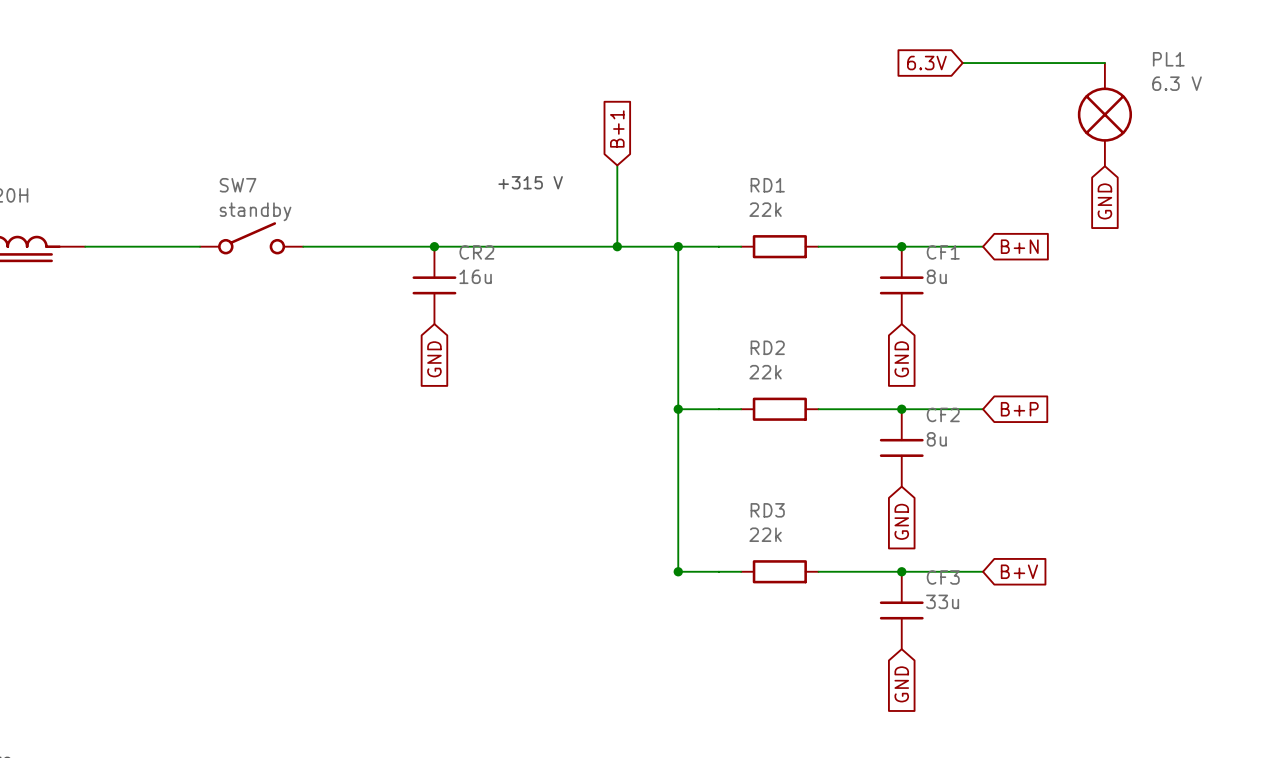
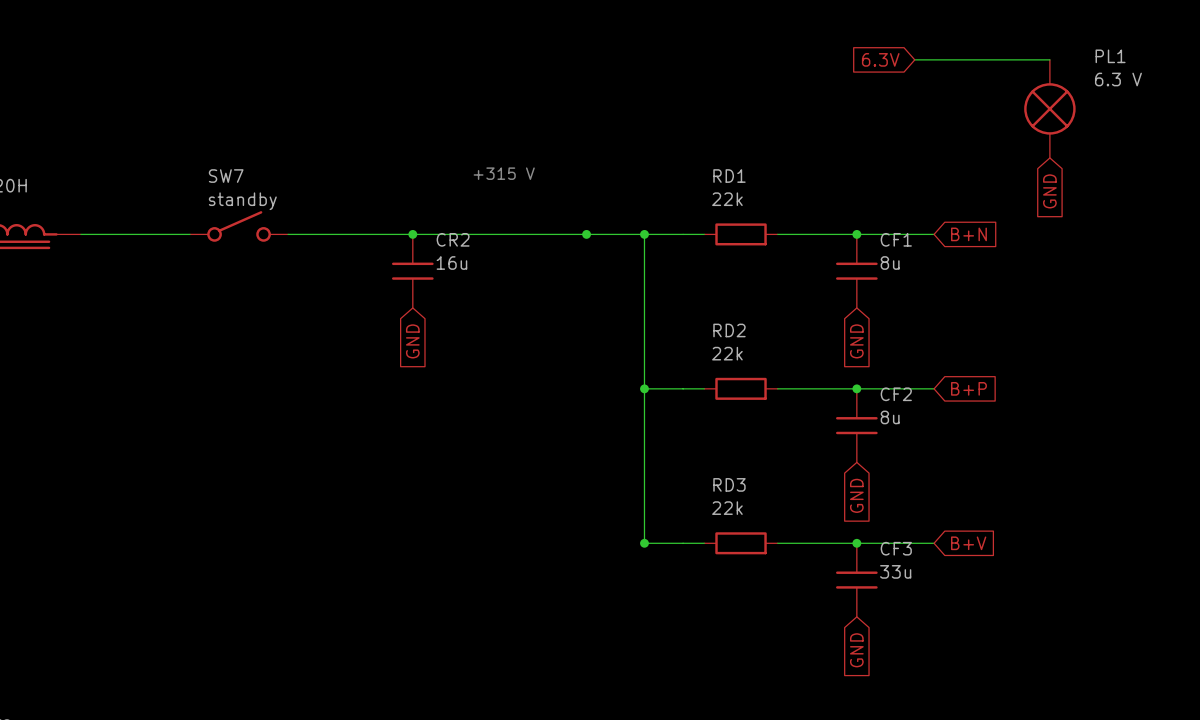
global label: B+1 (617, 129) -> none
wire: (617, 165) (617, 246) -> none

